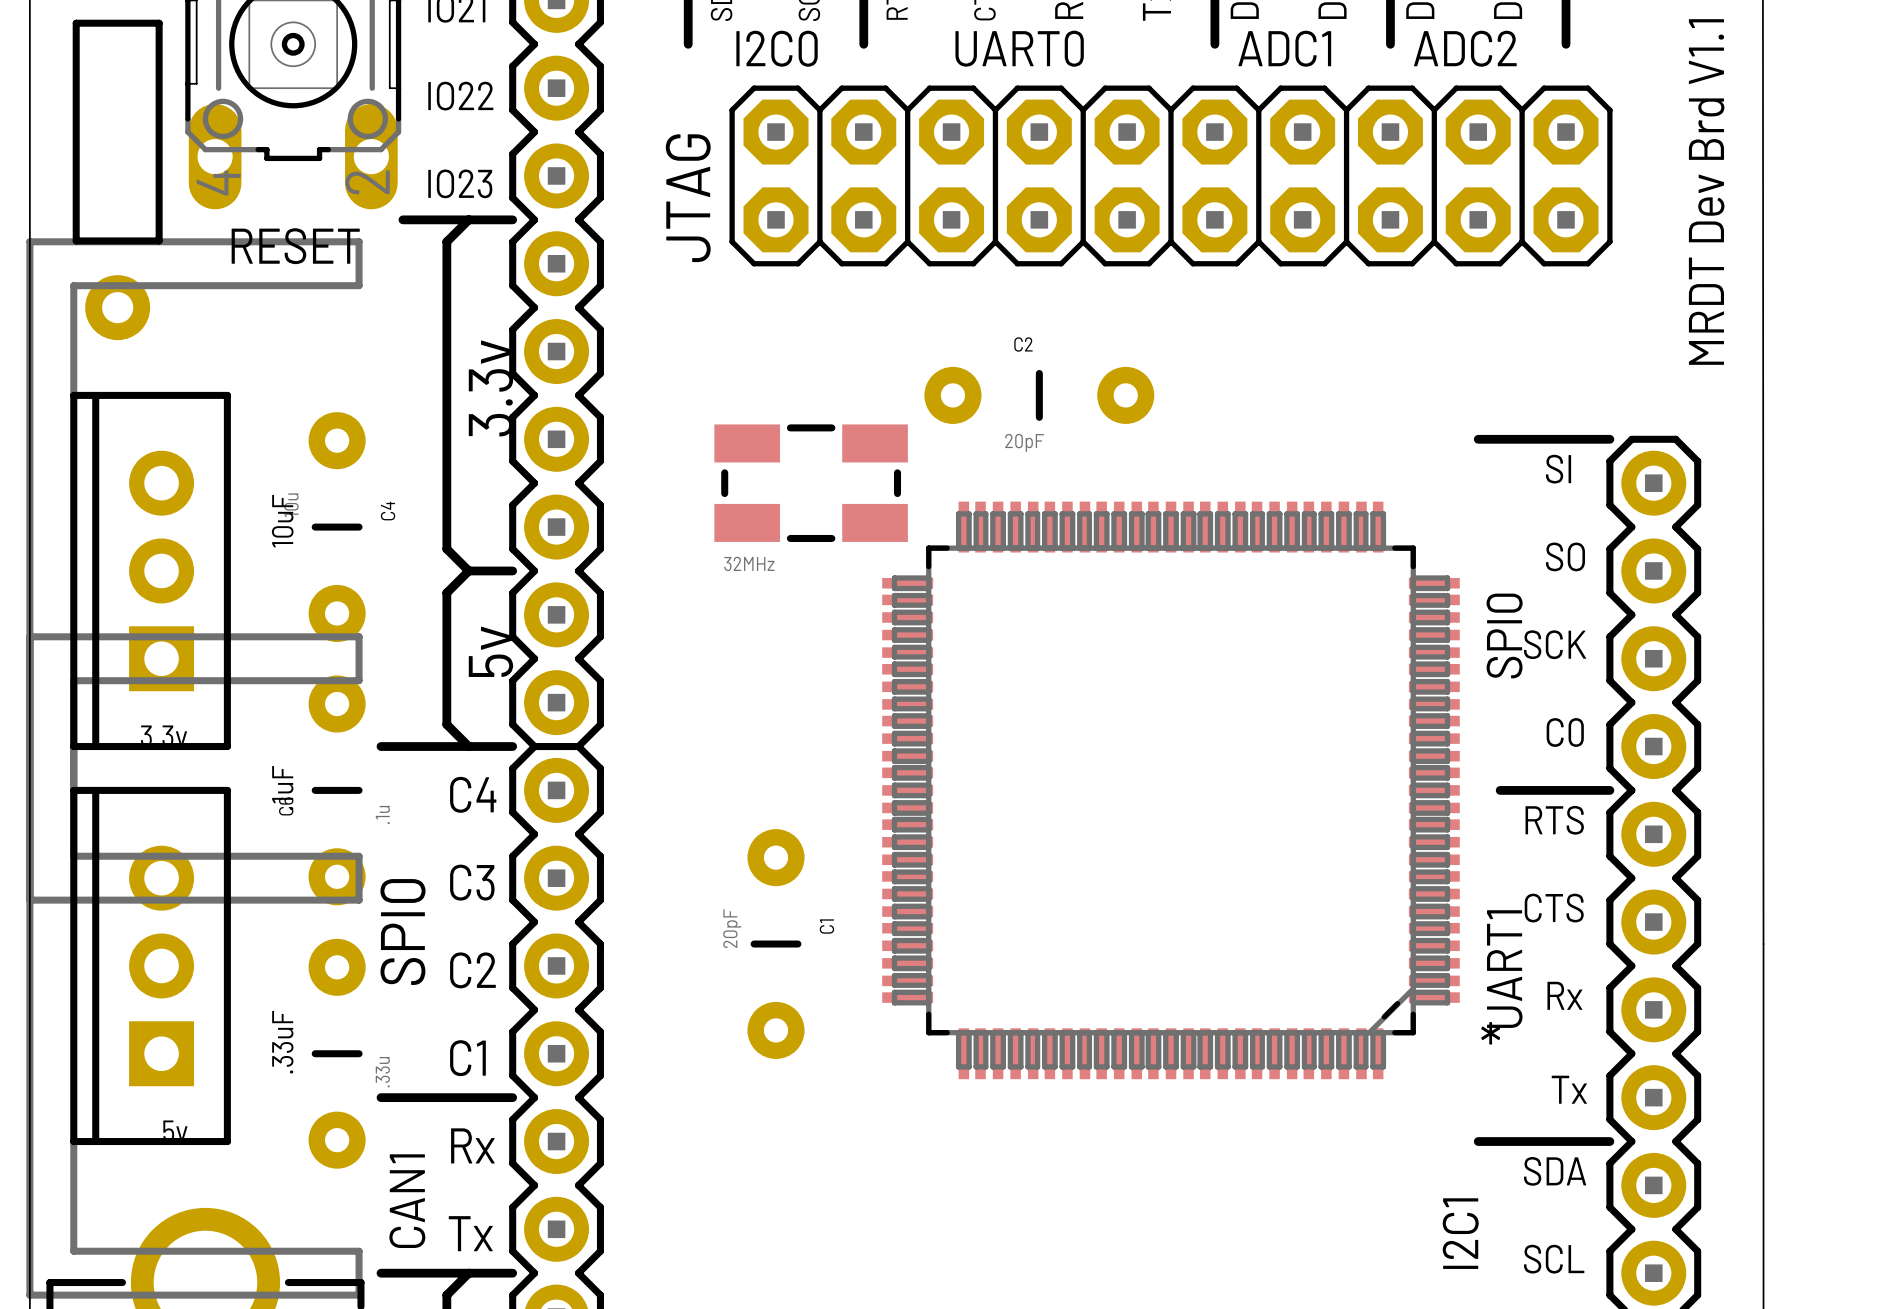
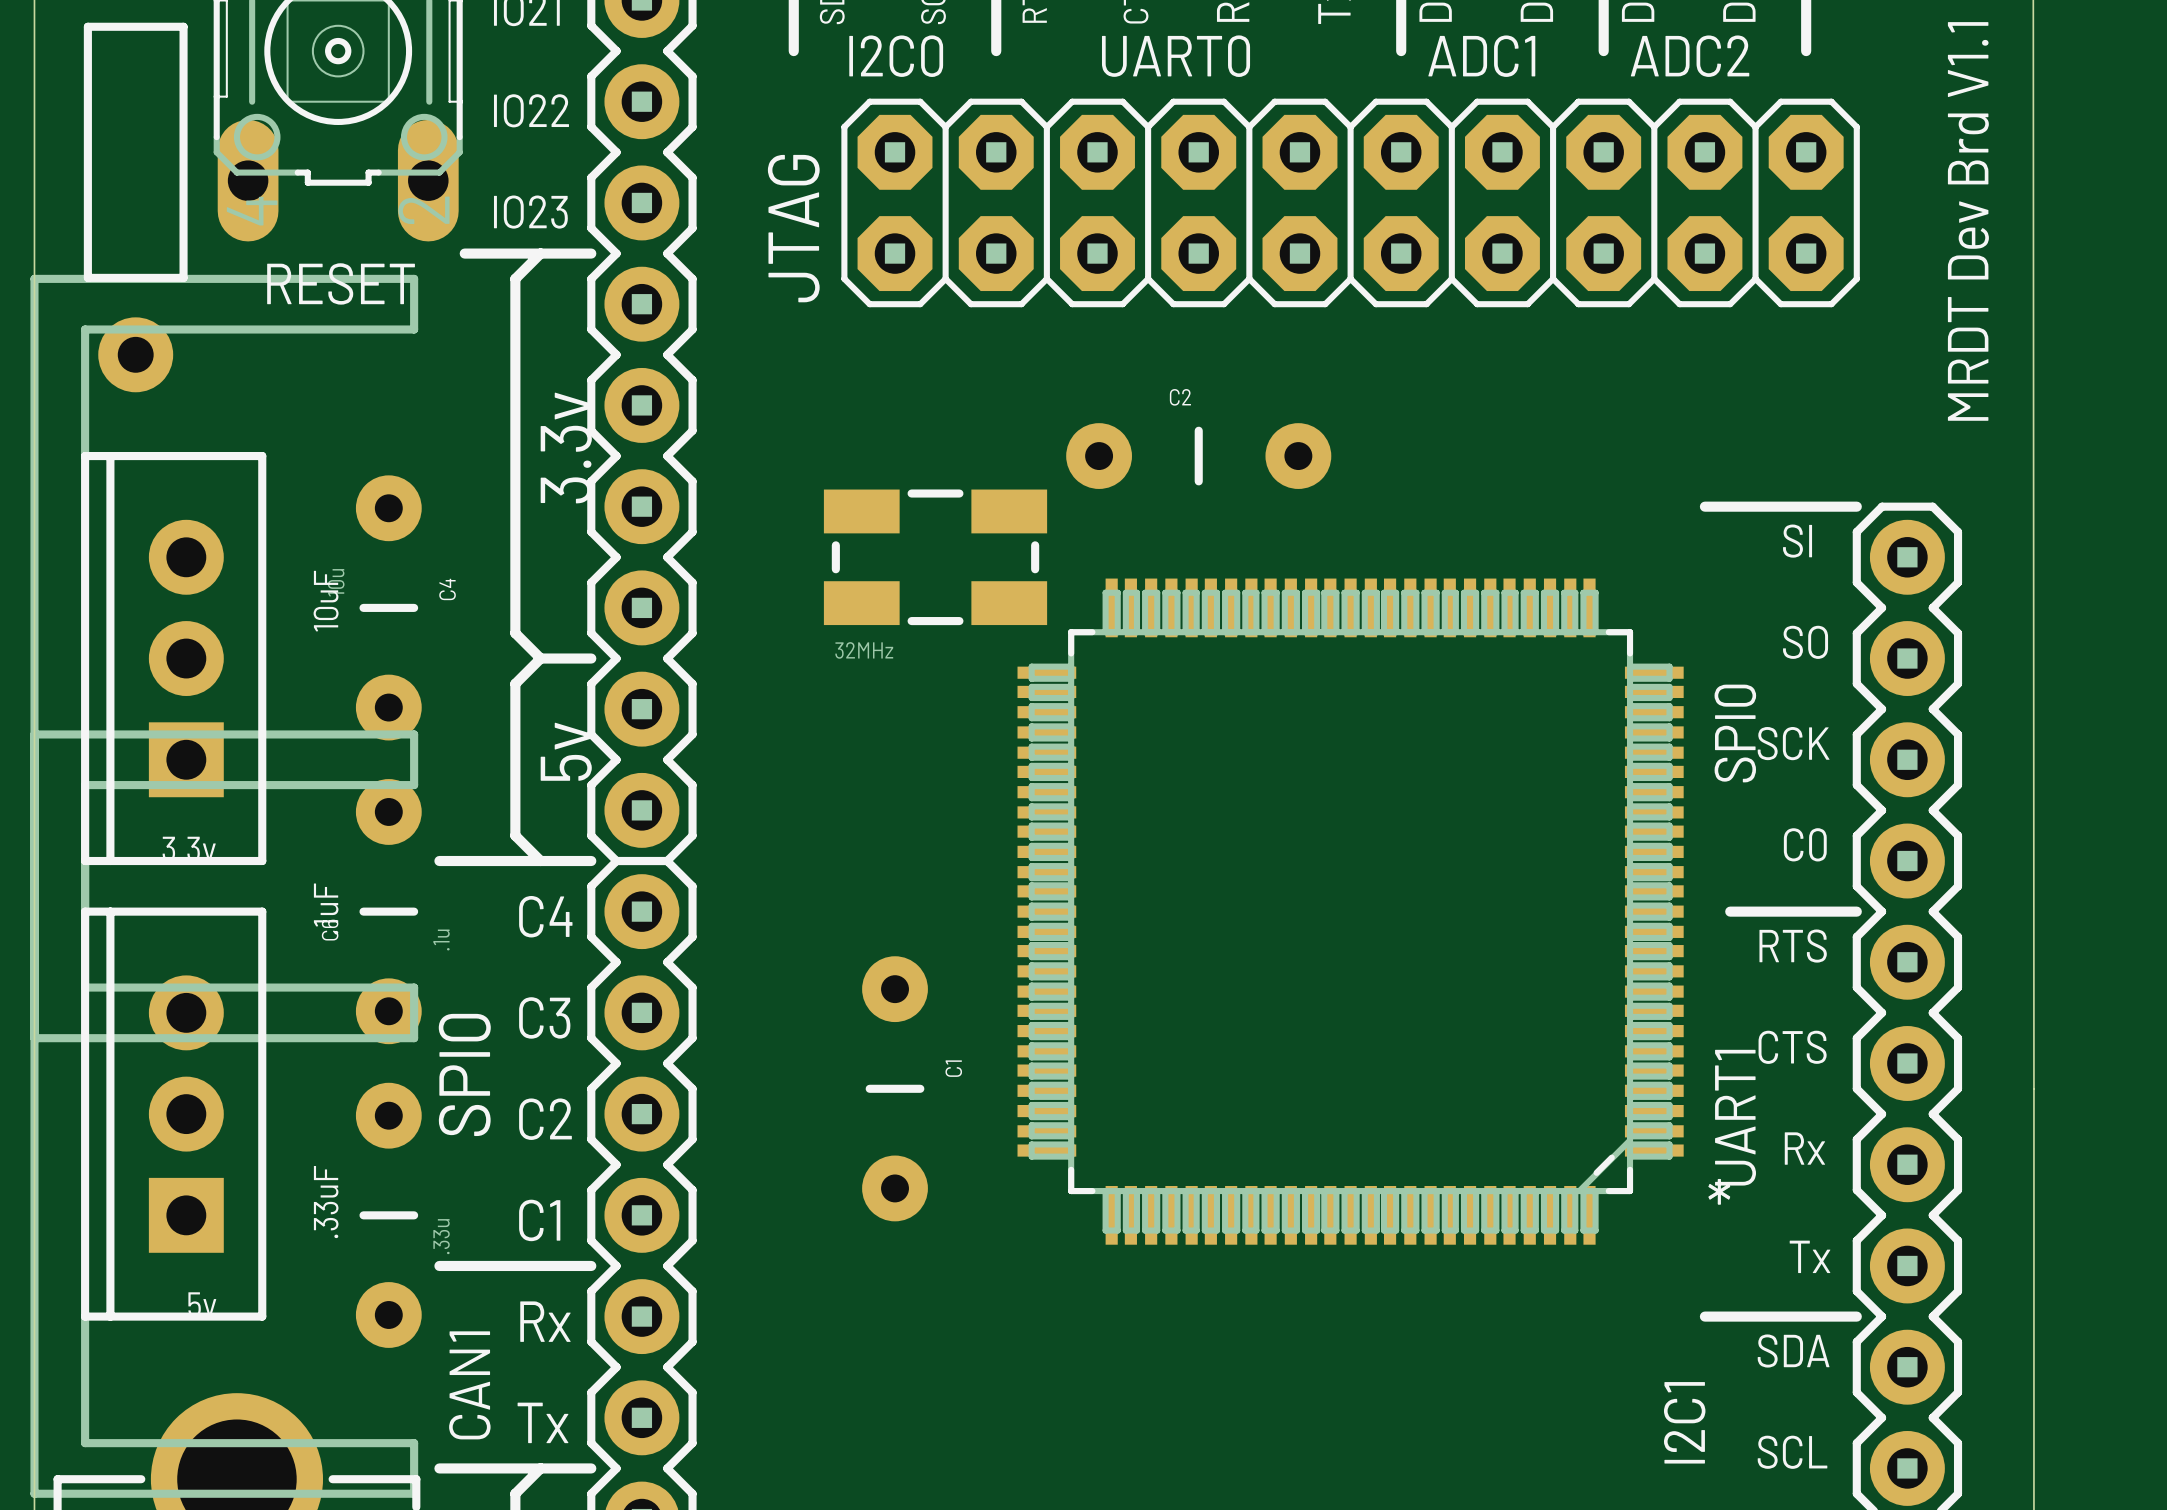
C2 value: 20pF (1024, 442) -> none
C1 value: 20pF (732, 928) -> none

